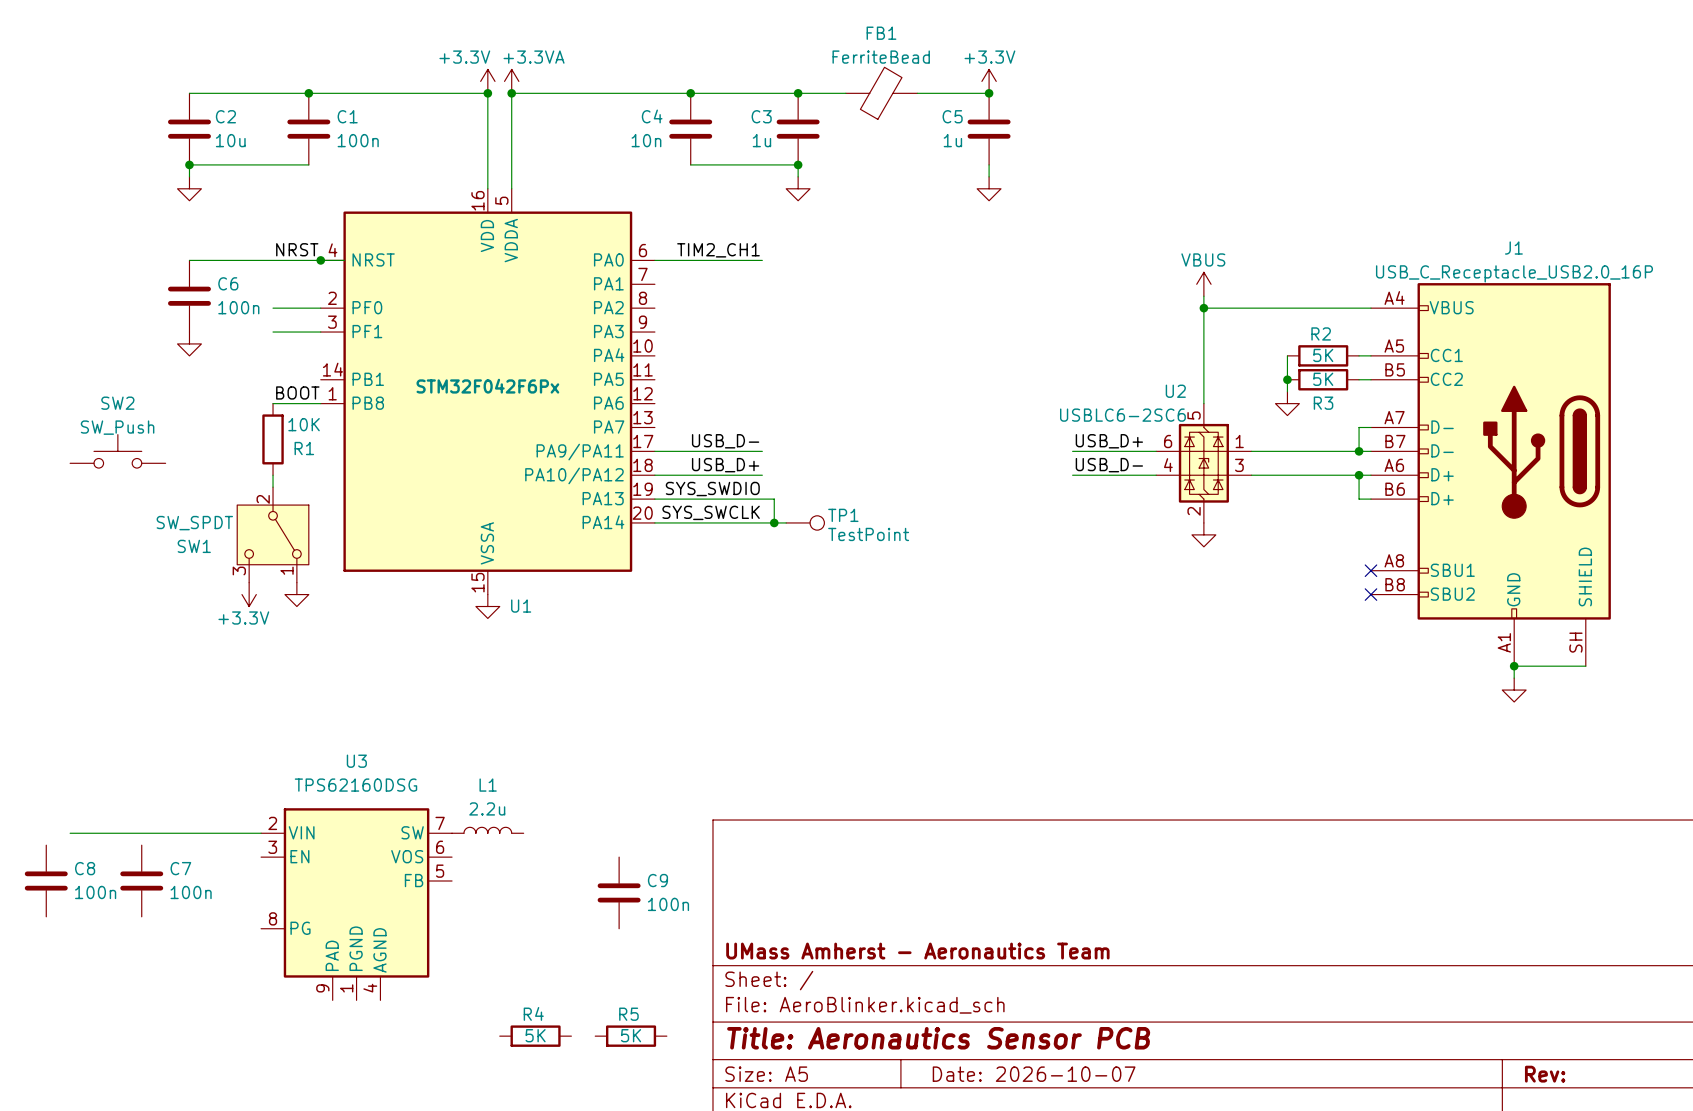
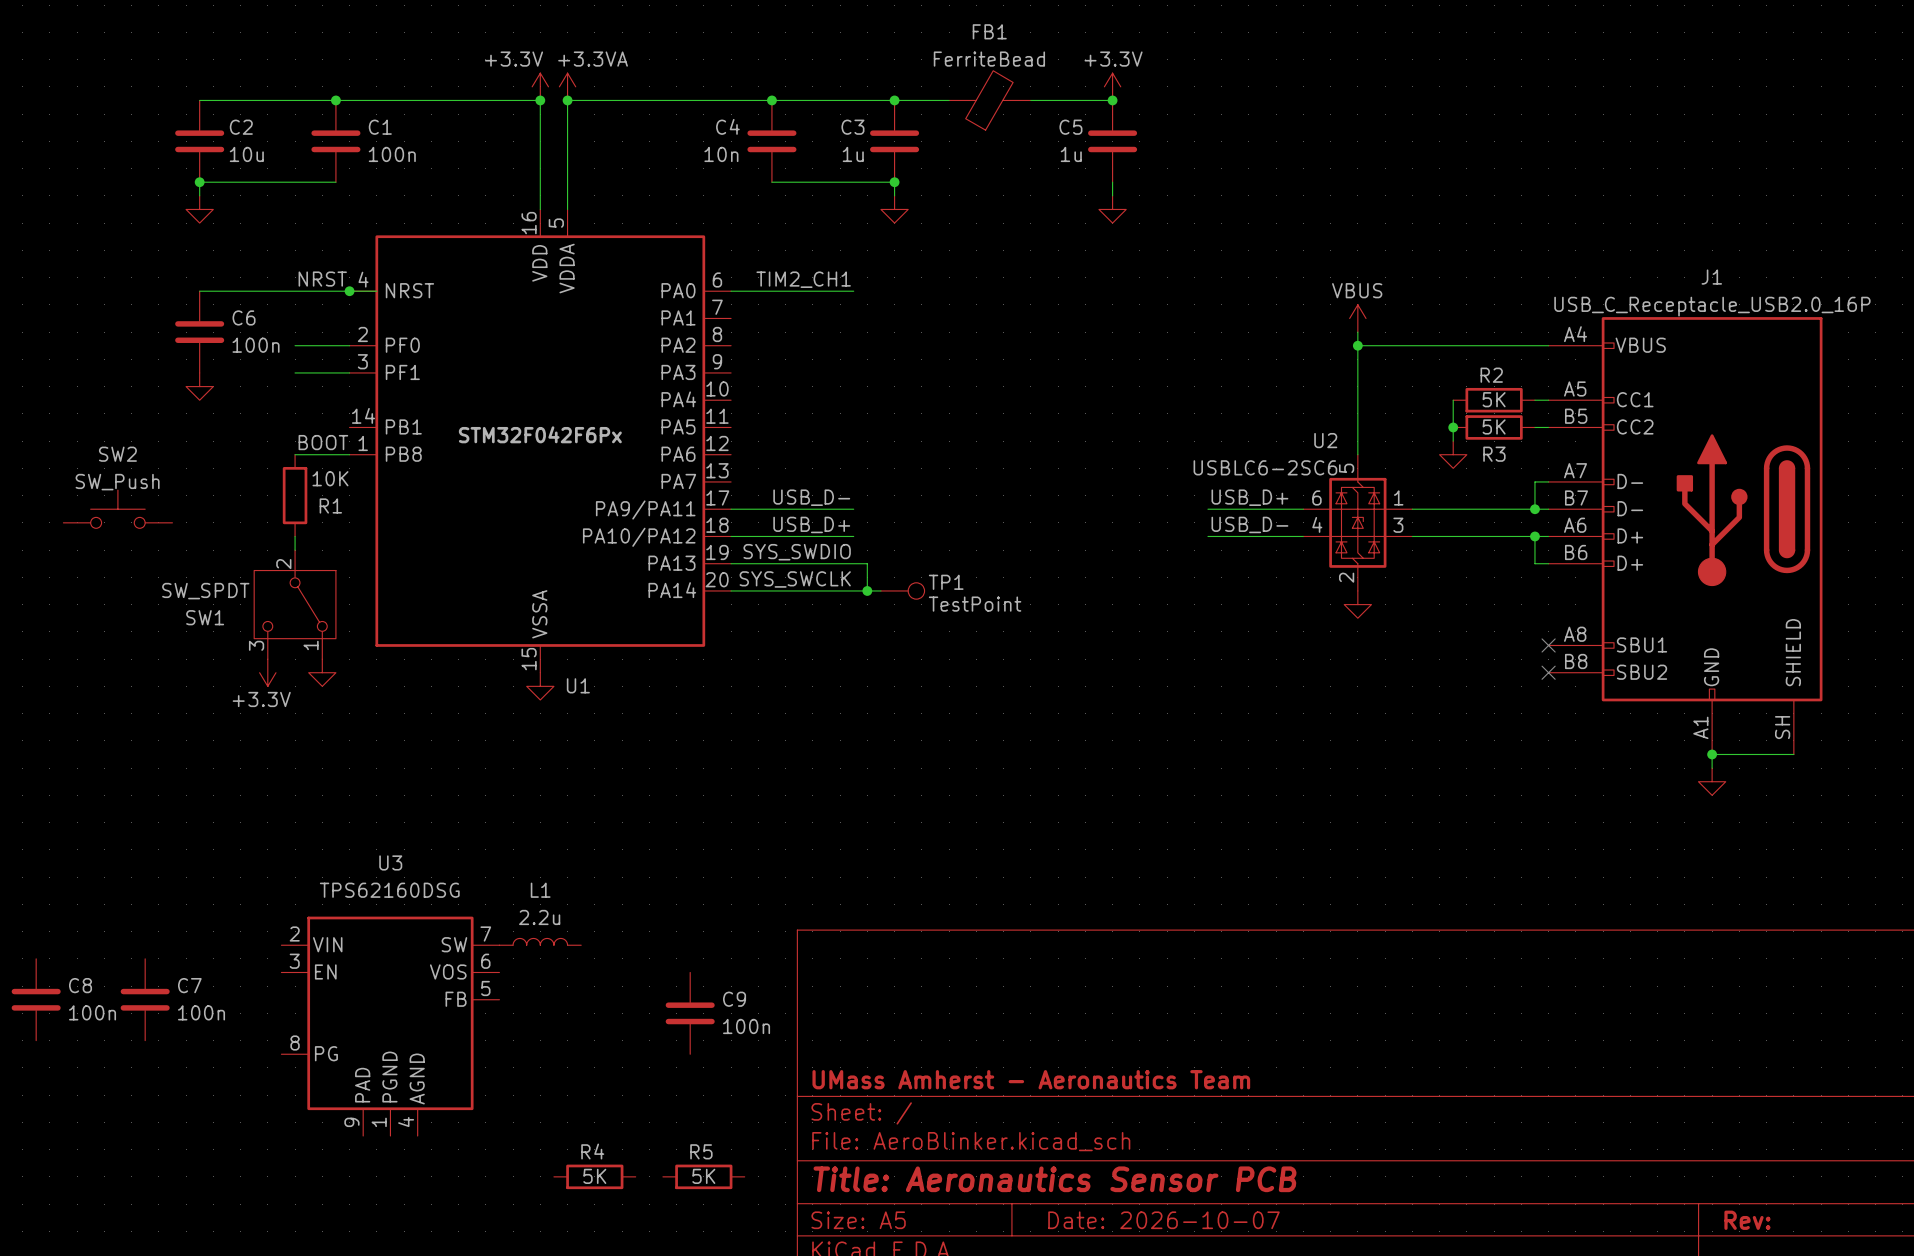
wire: (70, 833) (261, 833) -> none

